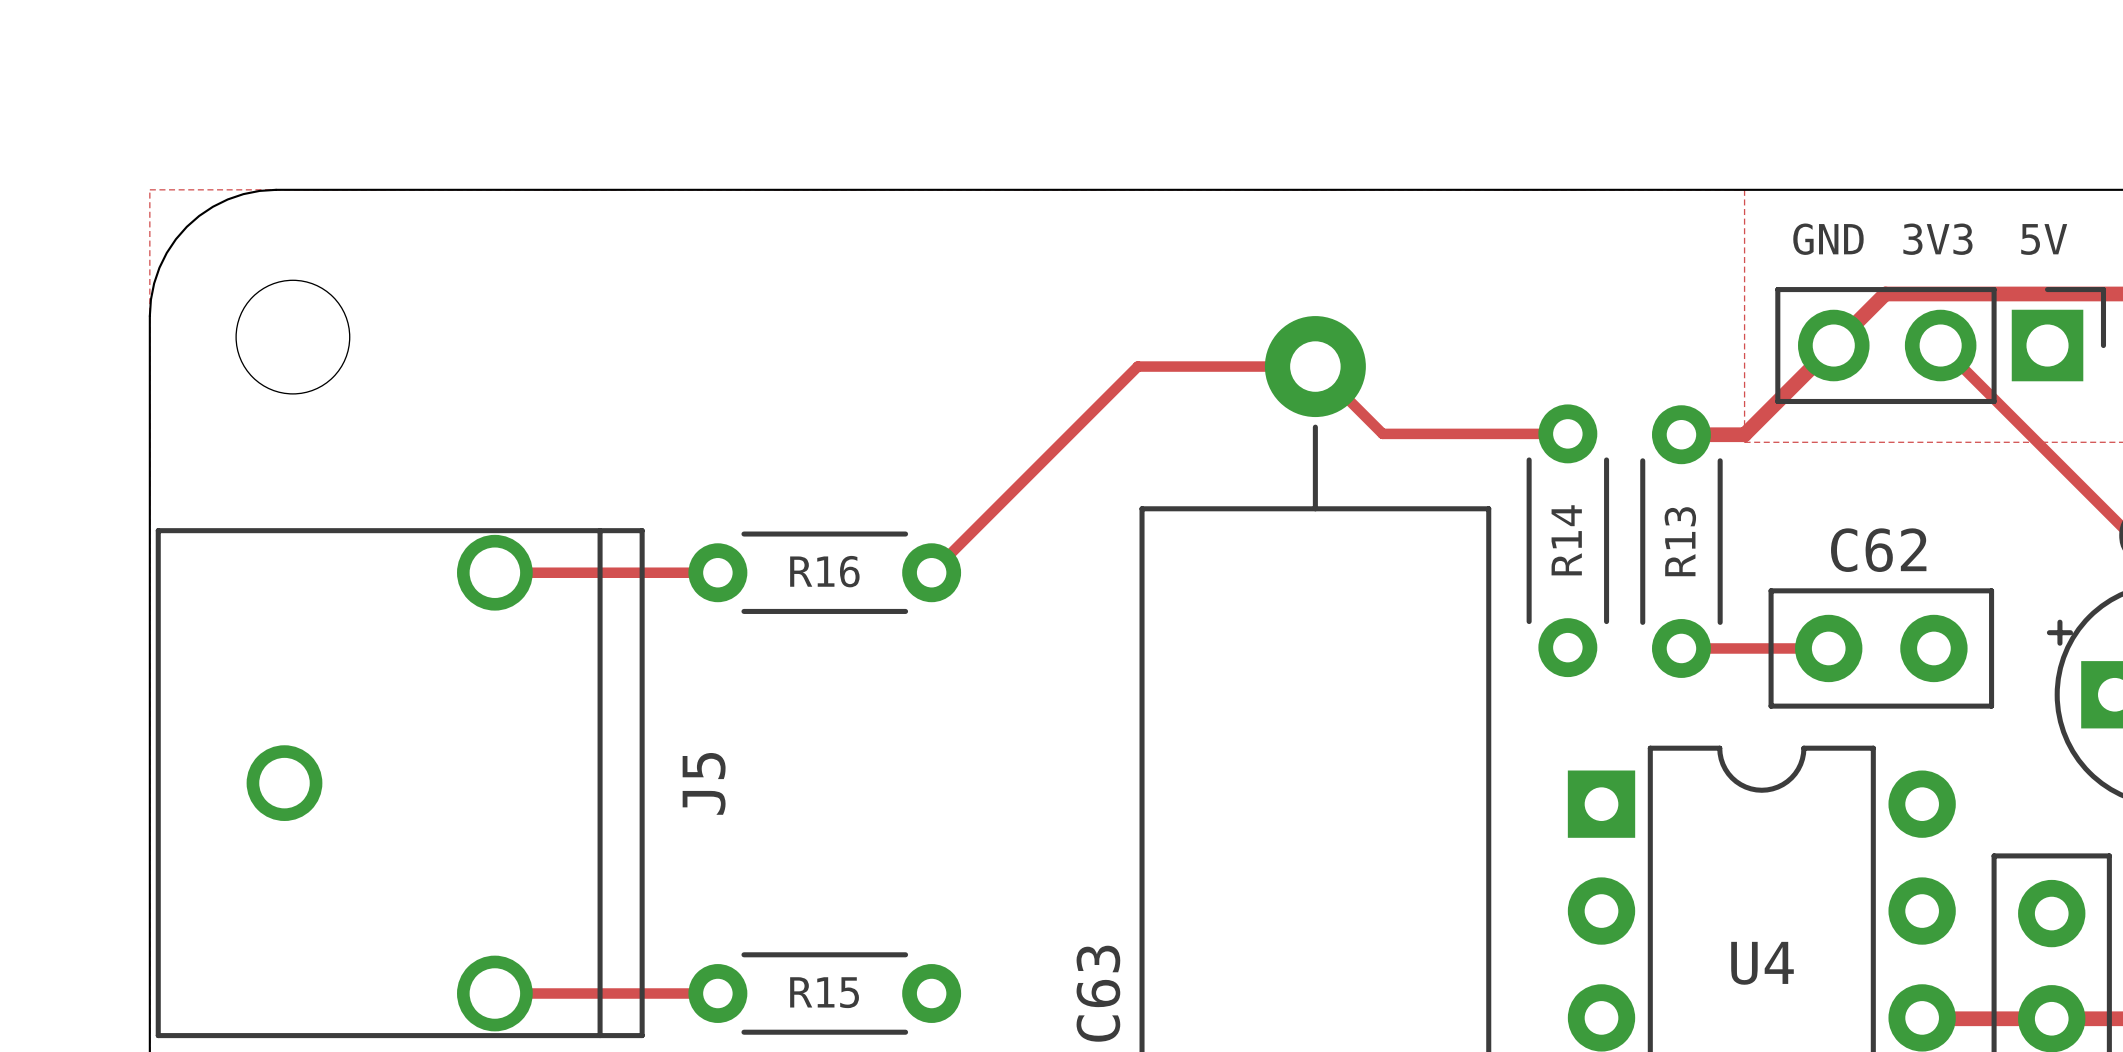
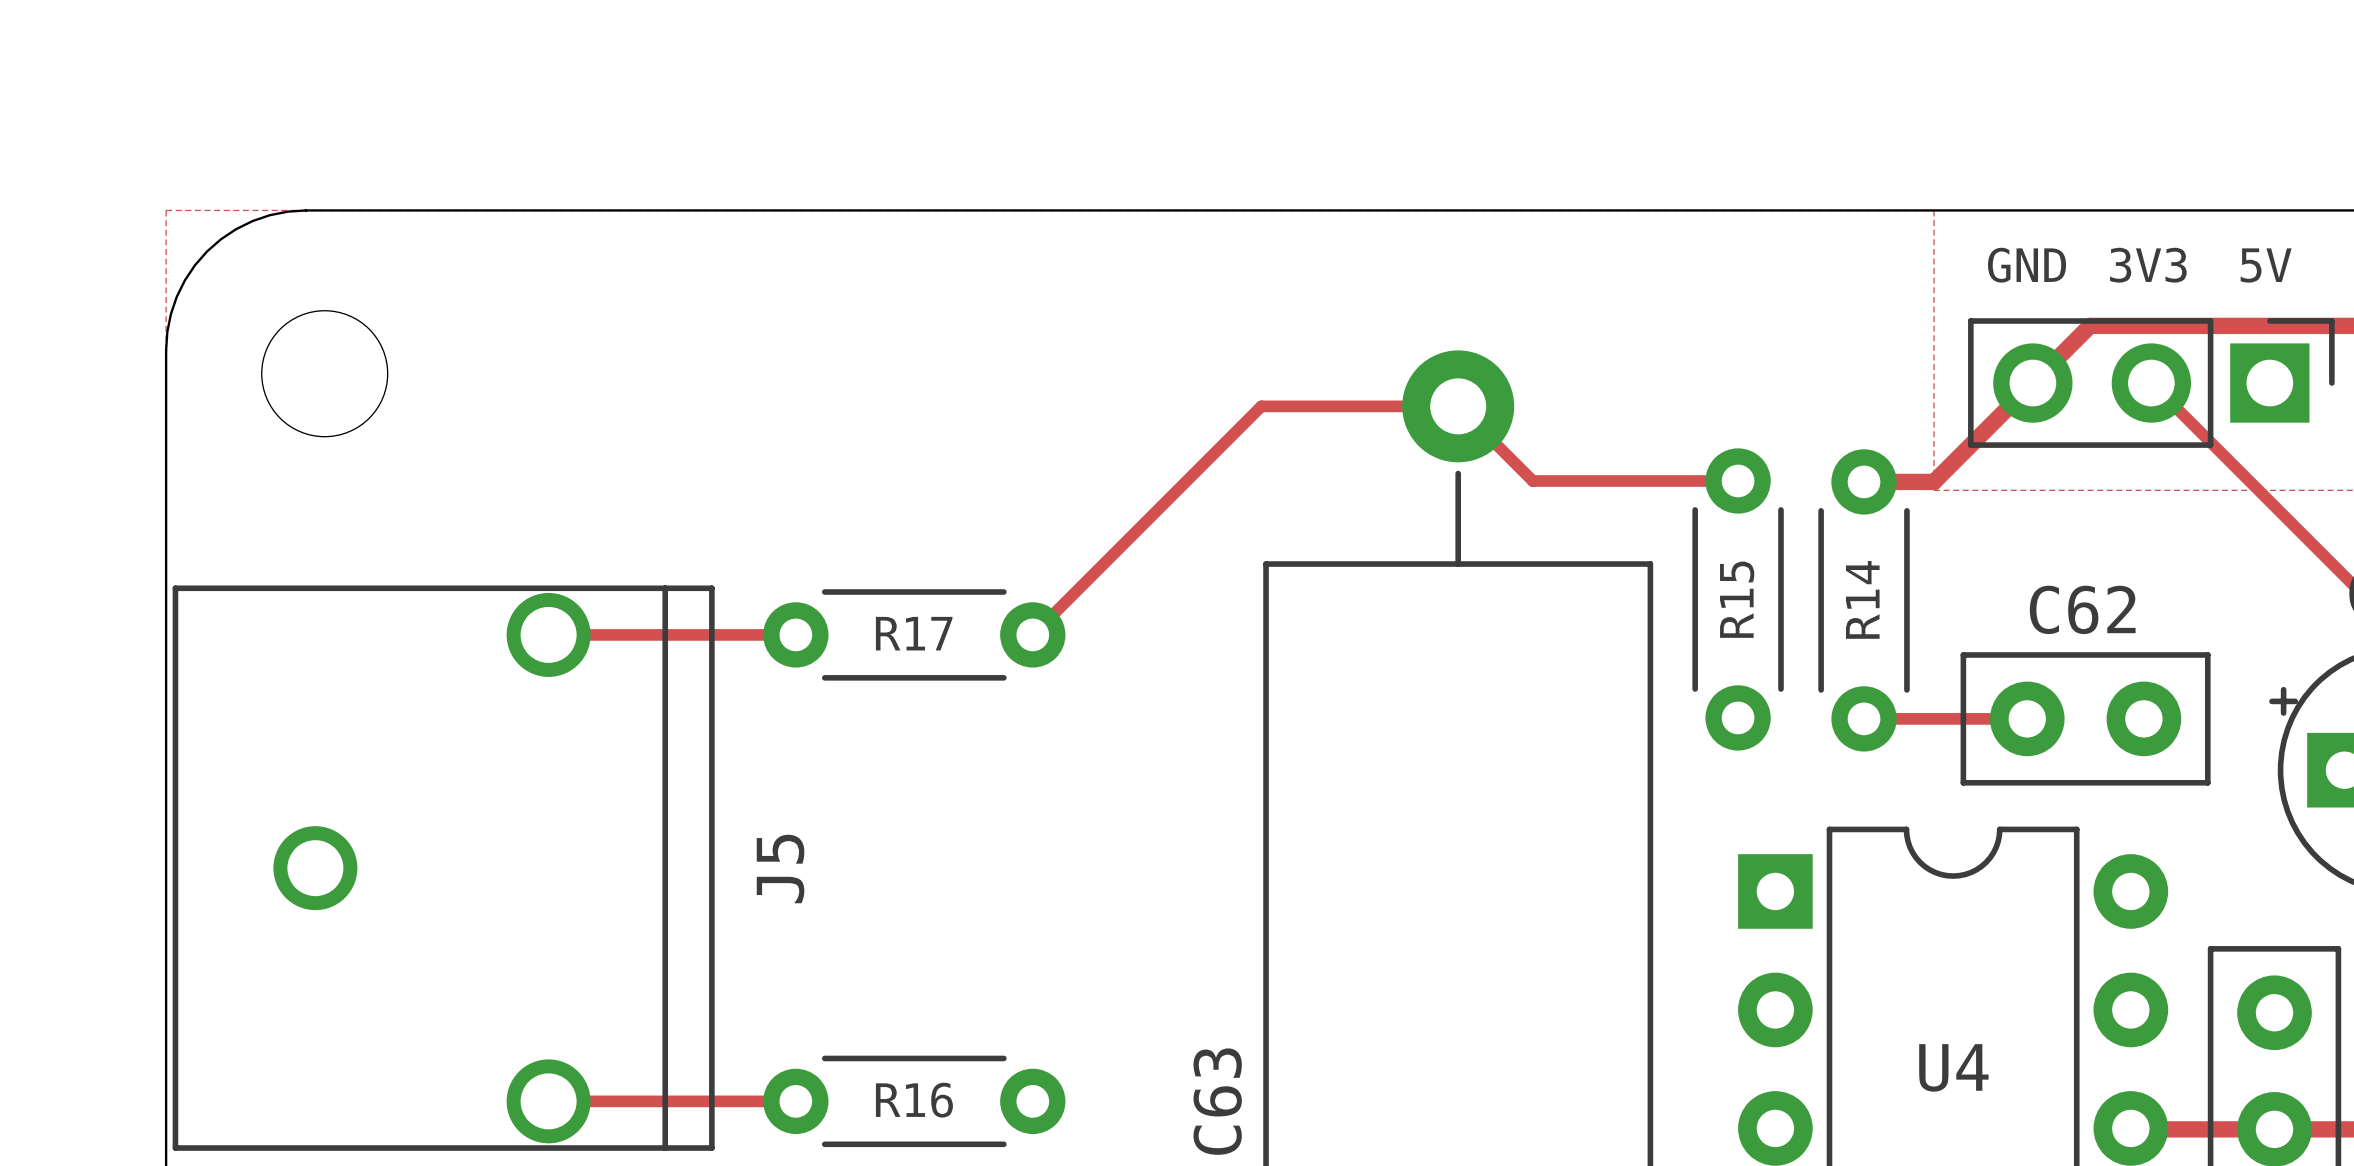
R14 name: R14 (1566, 540) -> R15 (1737, 599)
R13 name: R13 (1680, 541) -> R14 (1862, 599)
R16 name: R16 (824, 571) -> R17 (914, 633)
R15 name: R15 (824, 992) -> R16 (914, 1100)

